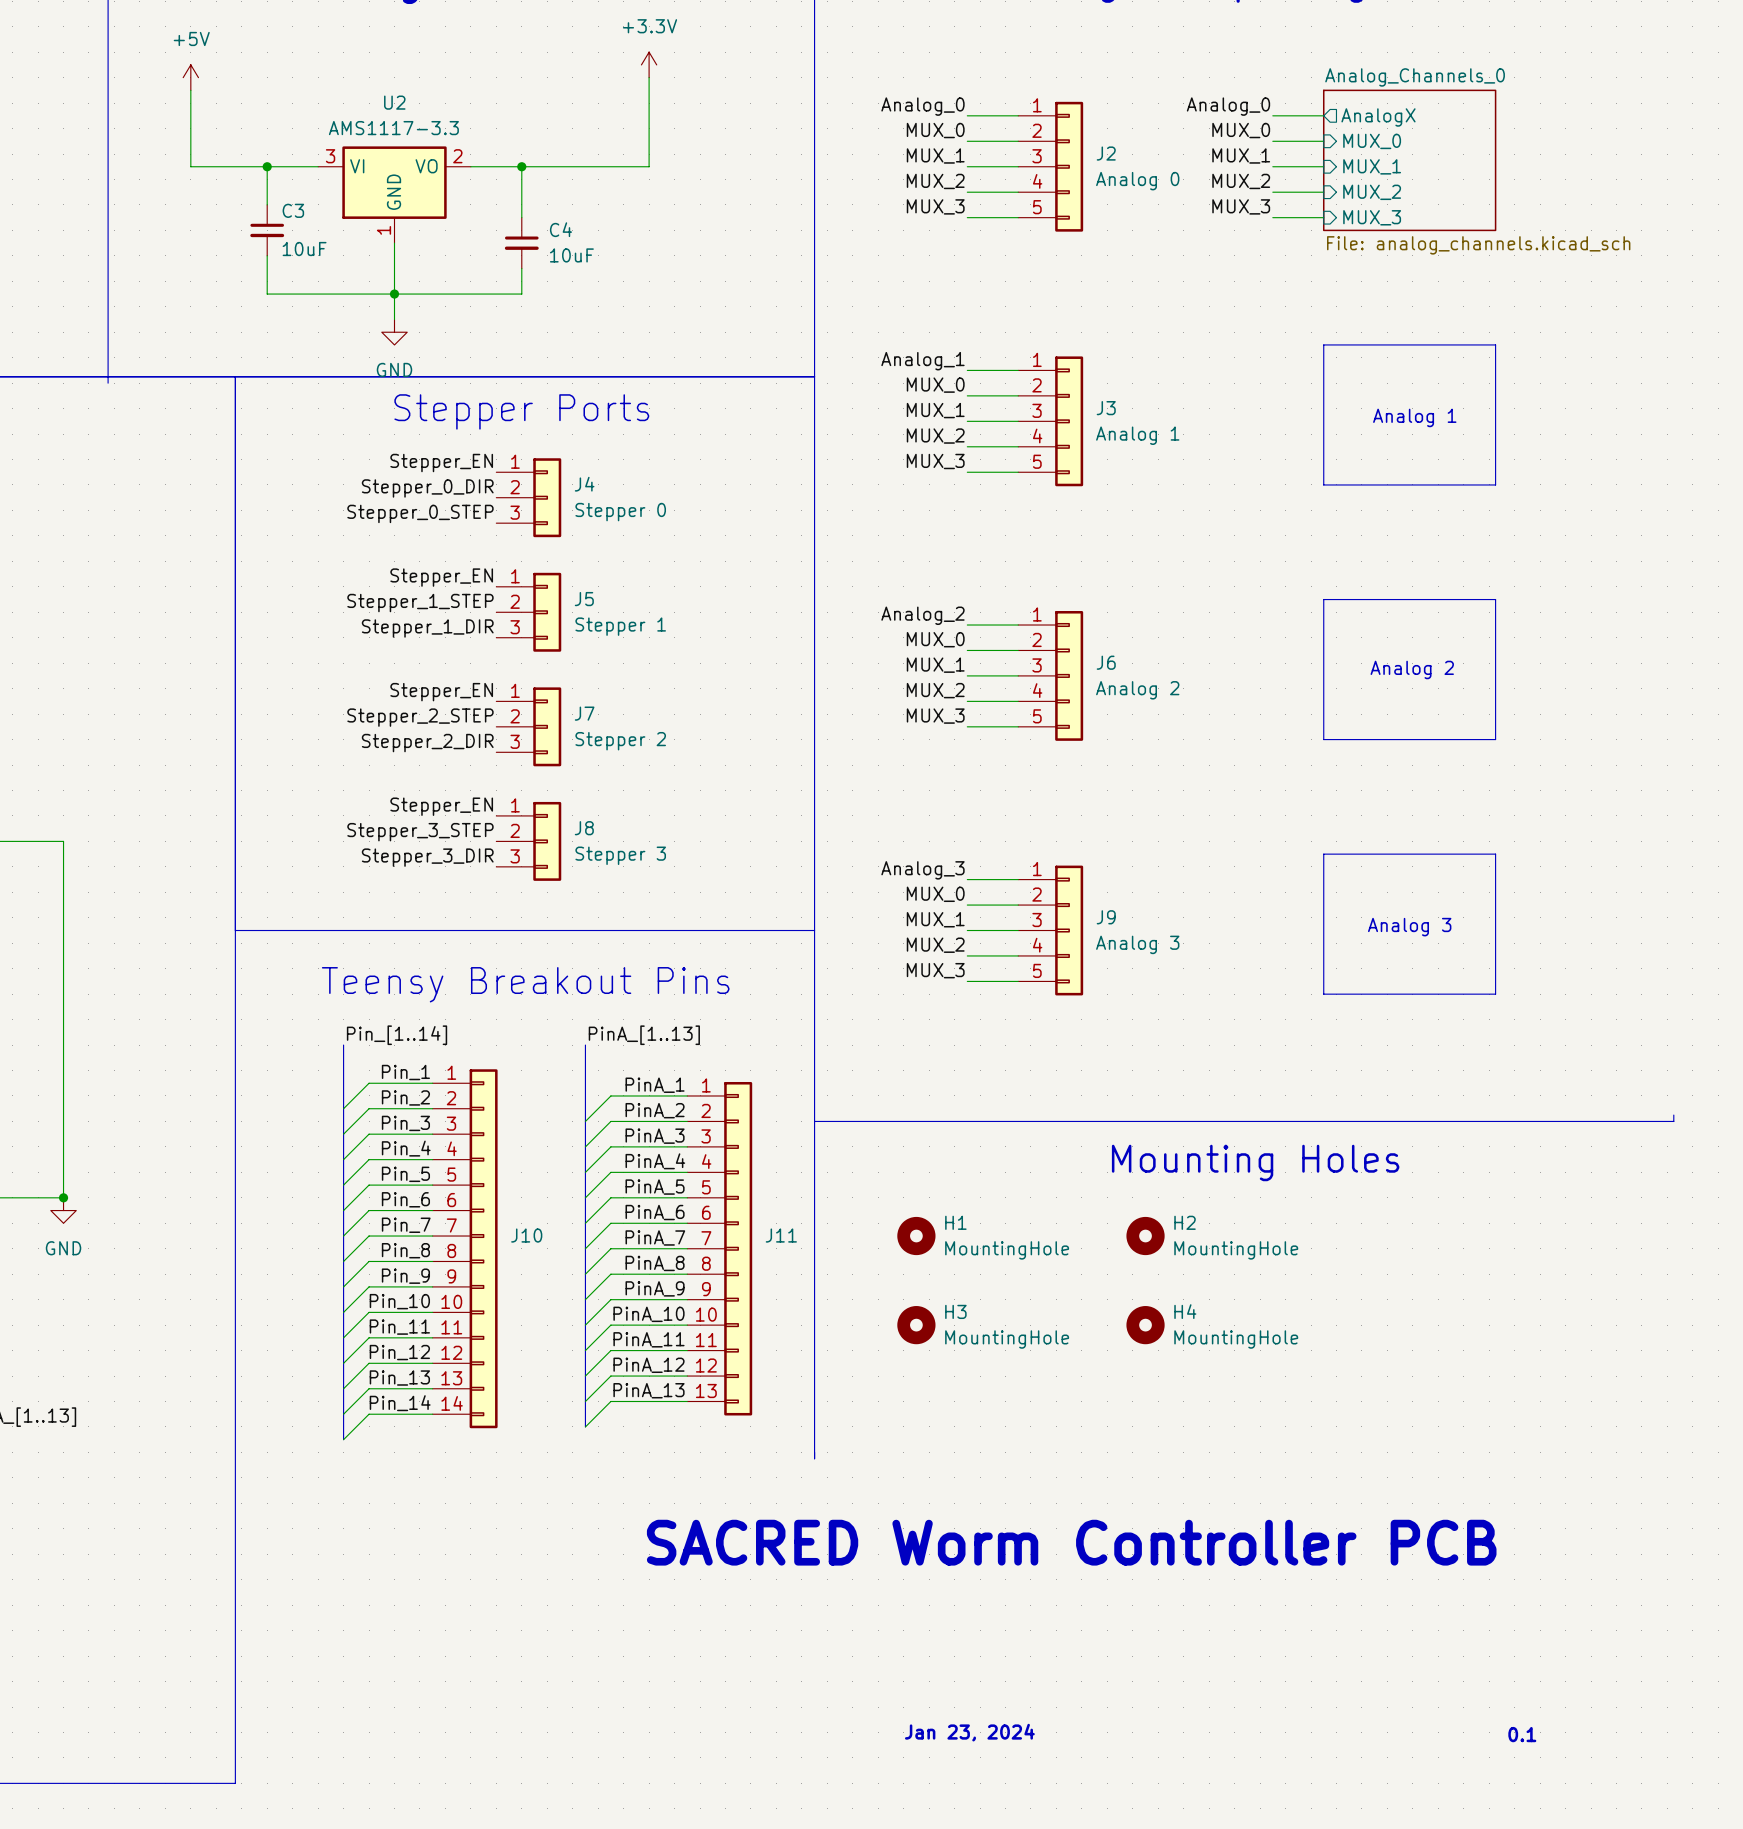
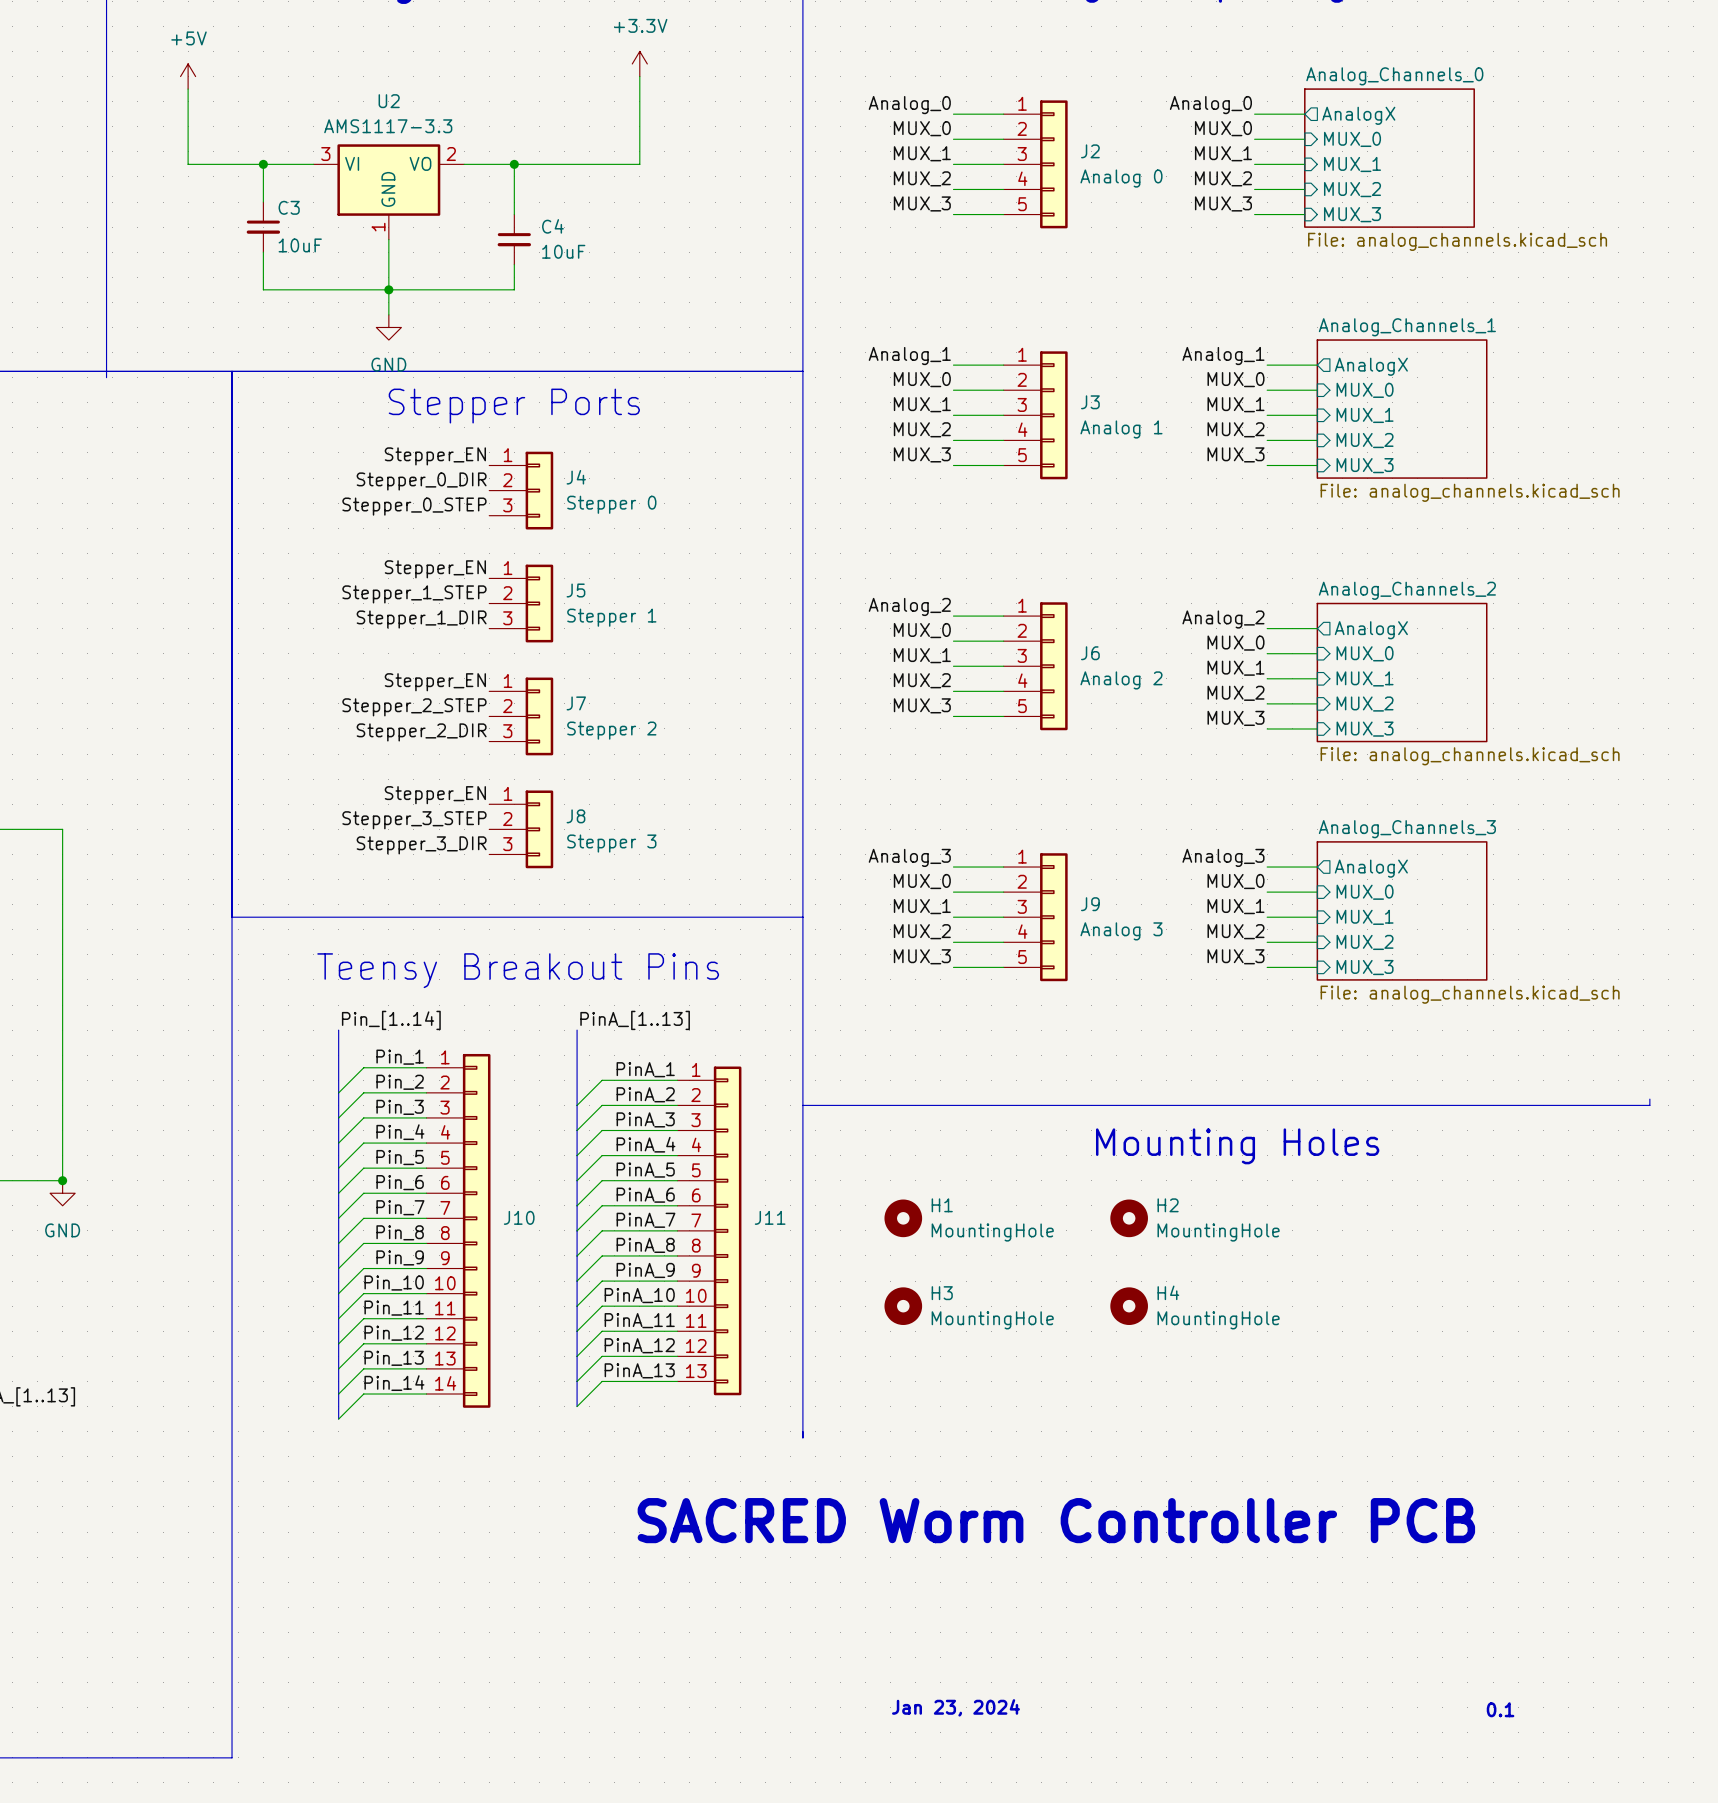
line: (1323, 344) (1495, 344) (1495, 484) (1323, 484) (1323, 344) -> none
label: none -> Analog_1 (1223, 356)
wire: none -> (1267, 365) (1317, 365)
sheet pin: none -> AnalogX (1371, 366)
label: none -> MUX_0 (1236, 379)
wire: none -> (1267, 390) (1317, 390)
sheet pin: none -> MUX_0 (1365, 390)
label: none -> MUX_1 (1236, 404)
sheet Analog_Channels_1: none -> File: analog_channels.kicad_sch (1402, 409)
text: Analog 1 (1414, 417) -> none
wire: none -> (1267, 415) (1317, 415)
sheet pin: none -> MUX_1 (1365, 415)
label: none -> MUX_2 (1236, 429)
wire: none -> (1267, 440) (1317, 440)
sheet pin: none -> MUX_2 (1365, 440)
label: none -> MUX_3 (1236, 454)
wire: none -> (1267, 465) (1317, 465)
sheet pin: none -> MUX_3 (1365, 465)
line: (1323, 599) (1323, 739) (1495, 739) (1495, 599) (1323, 599) -> none
label: none -> Analog_2 (1223, 619)
wire: none -> (1267, 628) (1317, 628)
sheet pin: none -> AnalogX (1371, 630)
label: none -> MUX_0 (1236, 643)
wire: none -> (1267, 653) (1317, 653)
sheet pin: none -> MUX_0 (1365, 653)
text: Analog 2 (1412, 669) -> none
label: none -> MUX_1 (1236, 668)
sheet Analog_Channels_2: none -> File: analog_channels.kicad_sch (1402, 672)
wire: none -> (1267, 678) (1317, 678)
sheet pin: none -> MUX_1 (1365, 678)
label: none -> MUX_2 (1236, 693)
wire: none -> (1267, 703) (1317, 703)
sheet pin: none -> MUX_2 (1365, 704)
label: none -> MUX_3 (1236, 718)
wire: none -> (1267, 728) (1317, 728)
sheet pin: none -> MUX_3 (1365, 729)
line: (1323, 854) (1323, 994) (1495, 994) (1495, 854) (1323, 854) -> none
label: none -> Analog_3 (1223, 857)
wire: none -> (1267, 867) (1317, 867)
sheet pin: none -> AnalogX (1371, 868)
label: none -> MUX_0 (1236, 881)
wire: none -> (1267, 892) (1317, 892)
sheet pin: none -> MUX_0 (1365, 892)
label: none -> MUX_1 (1236, 906)
sheet Analog_Channels_3: none -> File: analog_channels.kicad_sch (1402, 910)
text: Analog 3 (1409, 927) -> none
wire: none -> (1267, 917) (1317, 917)
sheet pin: none -> MUX_1 (1365, 917)
label: none -> MUX_2 (1236, 931)
wire: none -> (1267, 942) (1317, 942)
sheet pin: none -> MUX_2 (1365, 942)
label: none -> MUX_3 (1236, 956)
wire: none -> (1267, 967) (1317, 967)
sheet pin: none -> MUX_3 (1365, 967)

